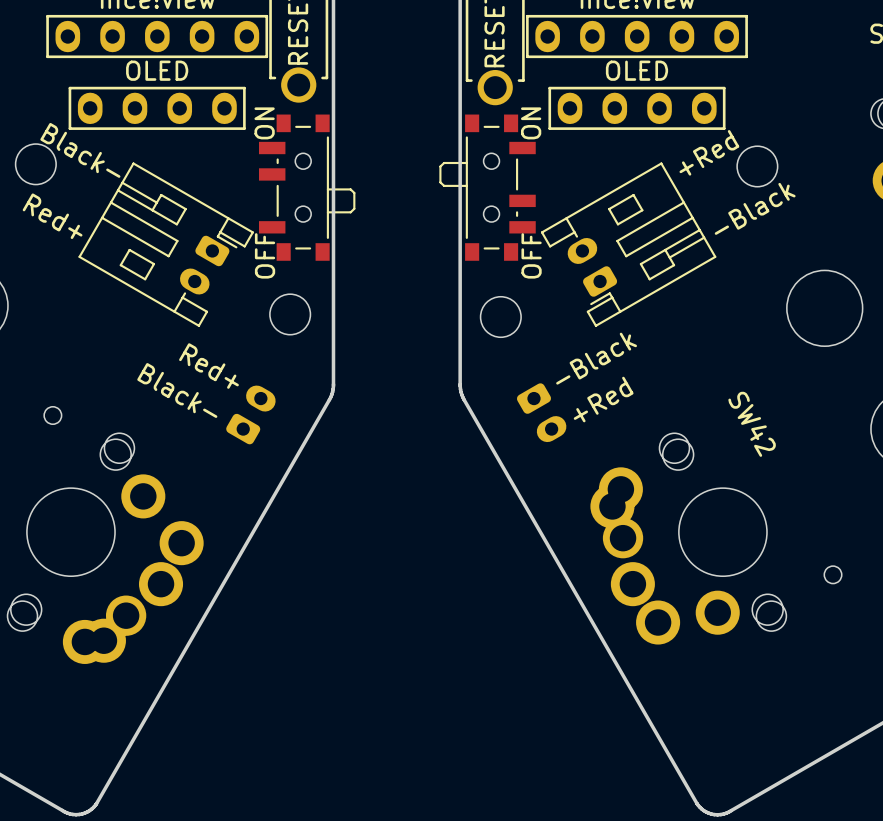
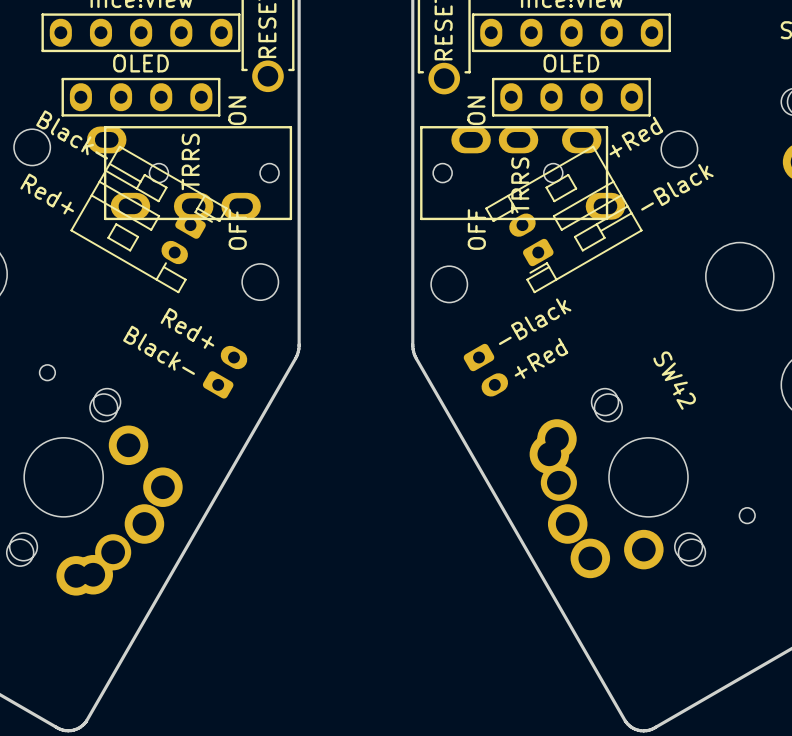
part: (307, 187) -> none
part: (487, 187) -> none
part: none -> (189, 173)
part: none -> (522, 173)

